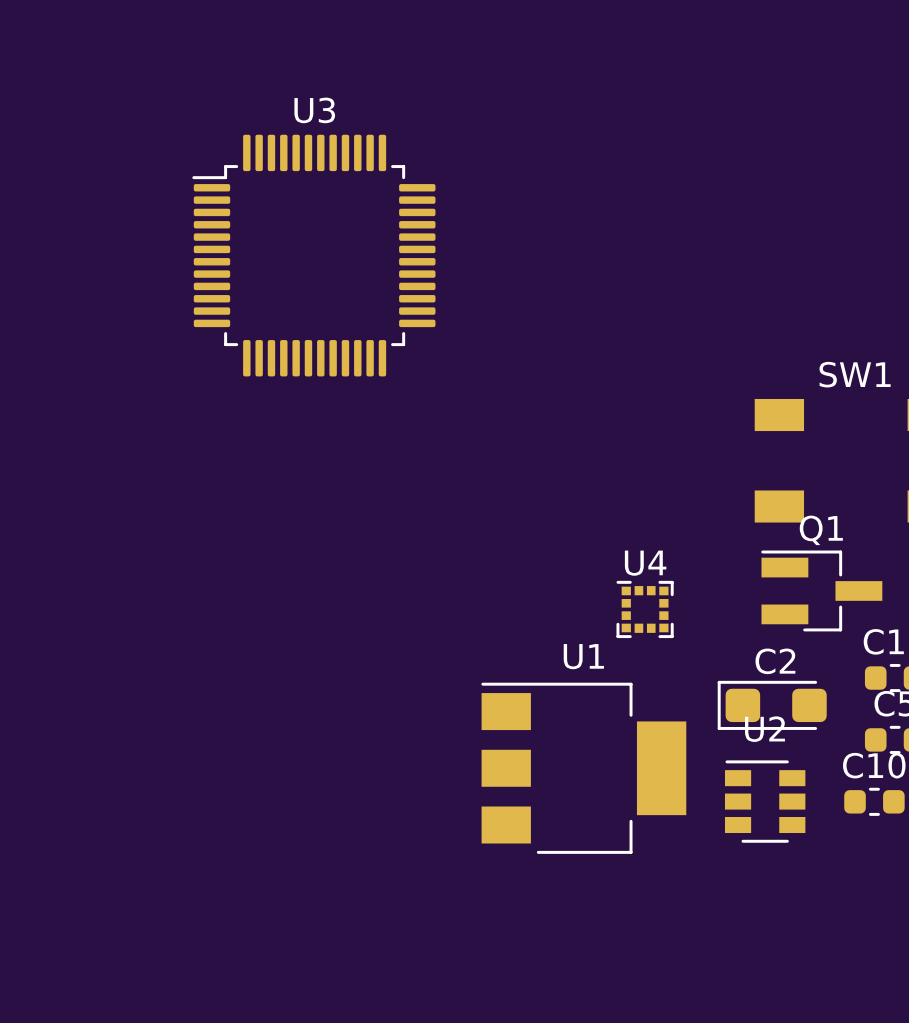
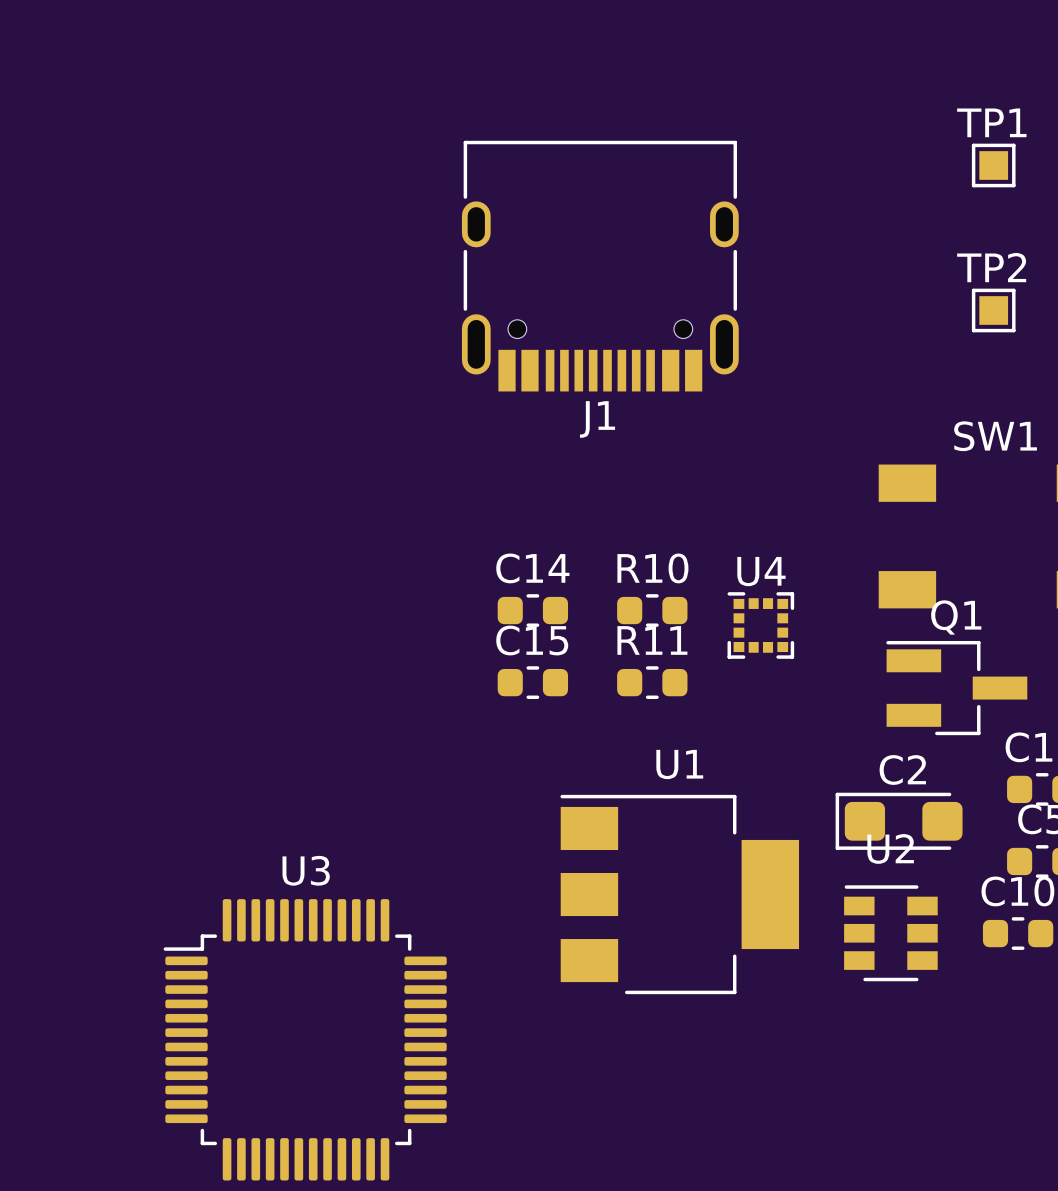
TP1: none -> (993, 165)
J1: none -> (600, 266)
U3 position: (313, 255) -> (305, 1039)
TP2: none -> (993, 310)
C14: none -> (532, 610)
R10: none -> (652, 610)
C15: none -> (532, 682)
R11: none -> (652, 682)
U4 position: (645, 609) -> (760, 625)

